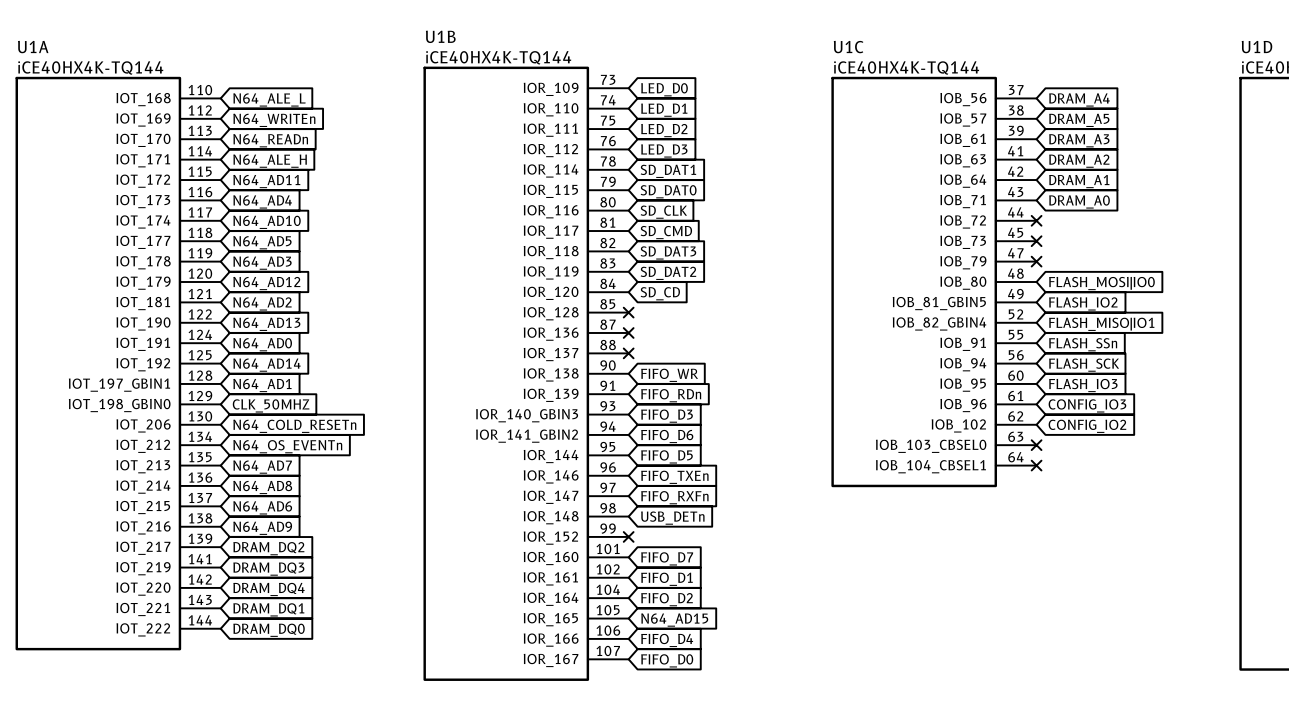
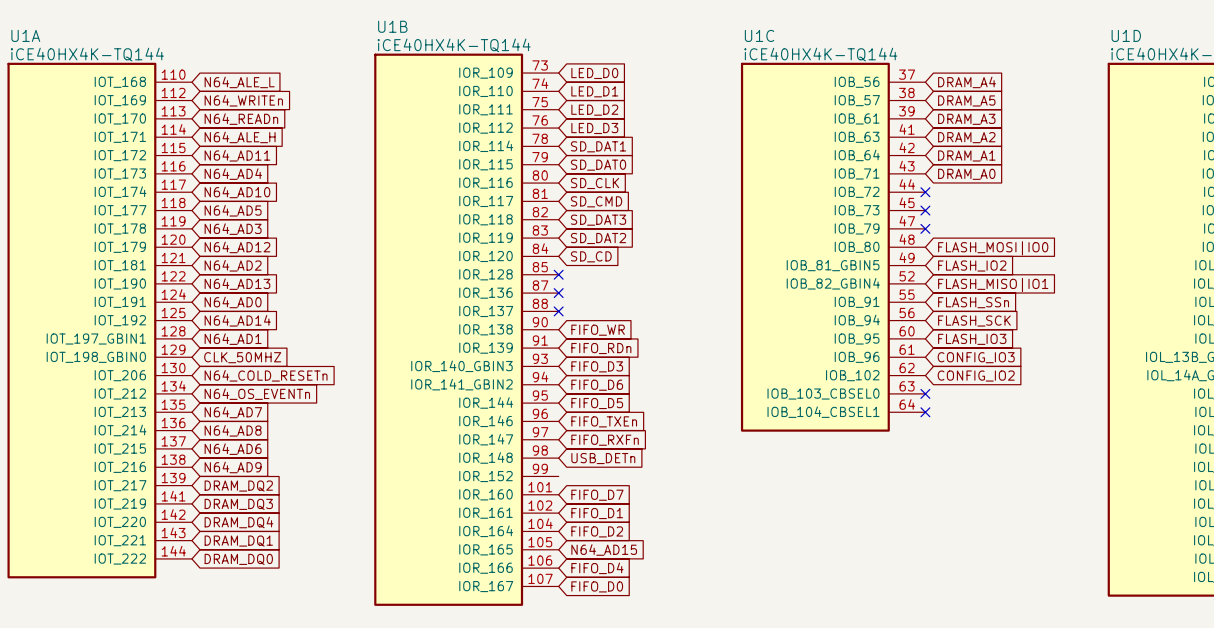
no-connect mark: (628, 536) -> none

